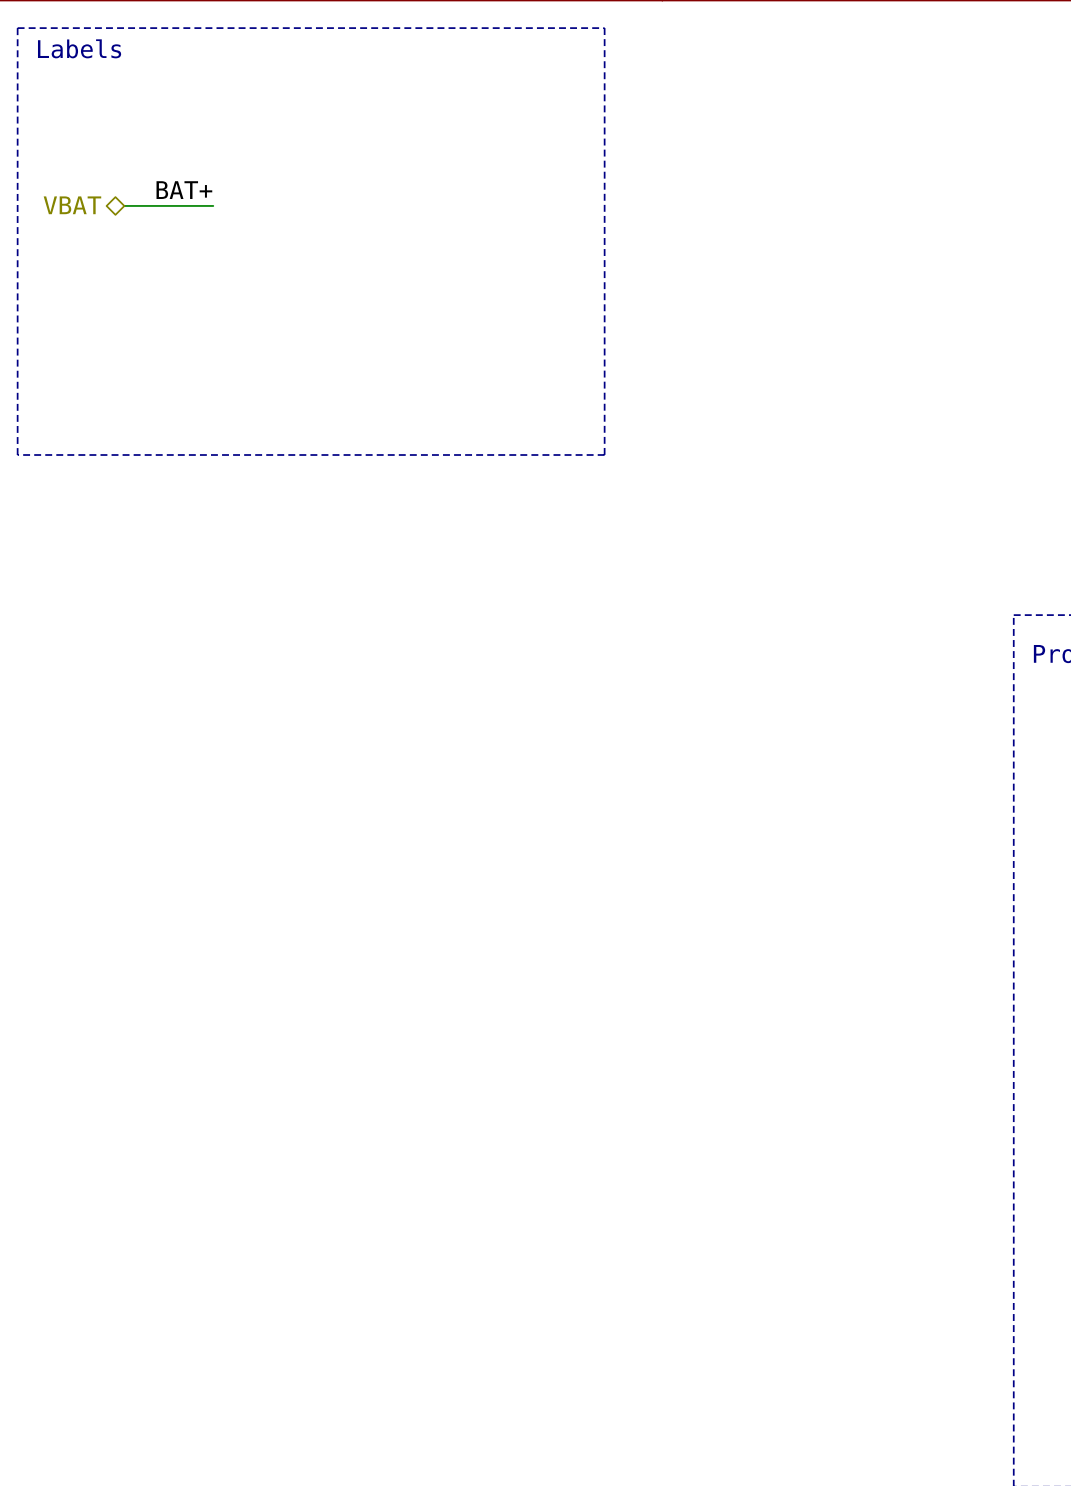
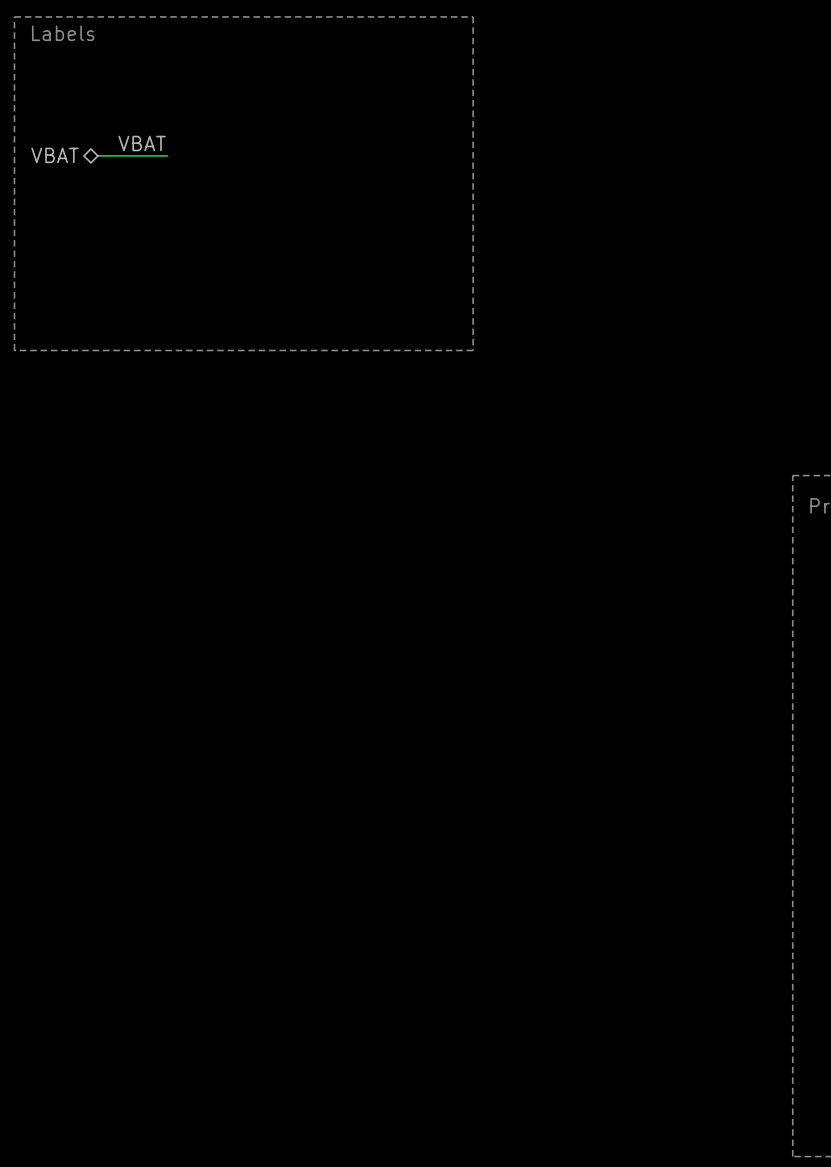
label: BAT+ (184, 190) -> VBAT (142, 143)

